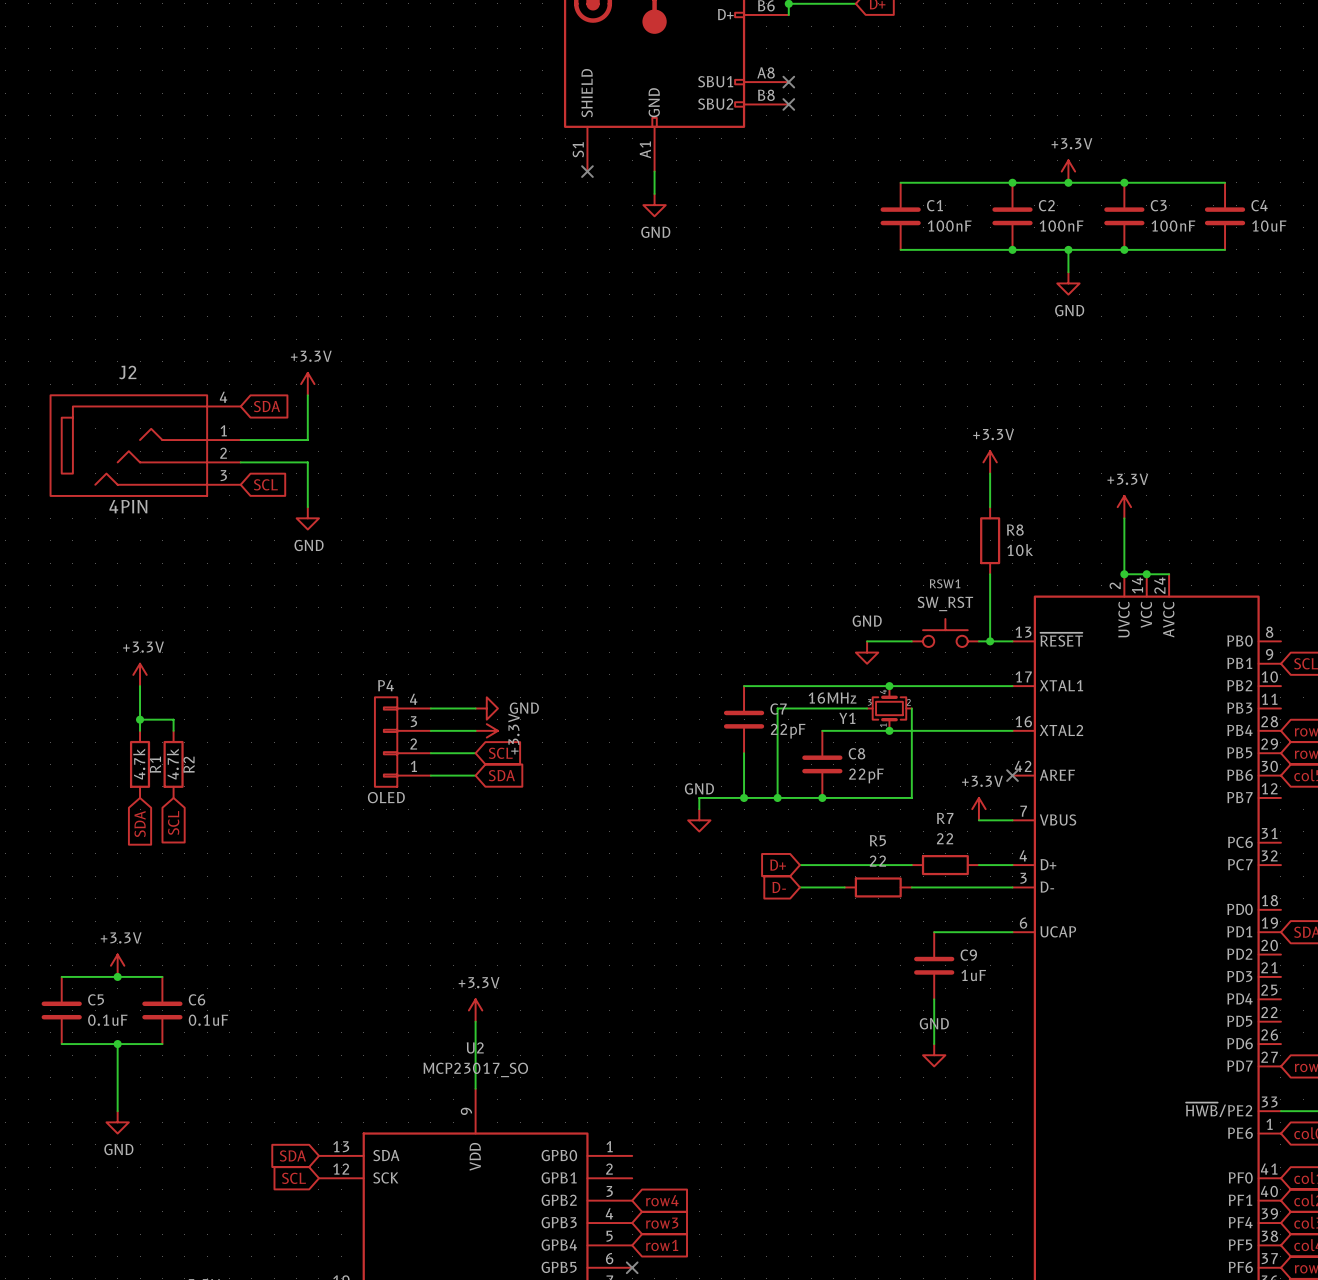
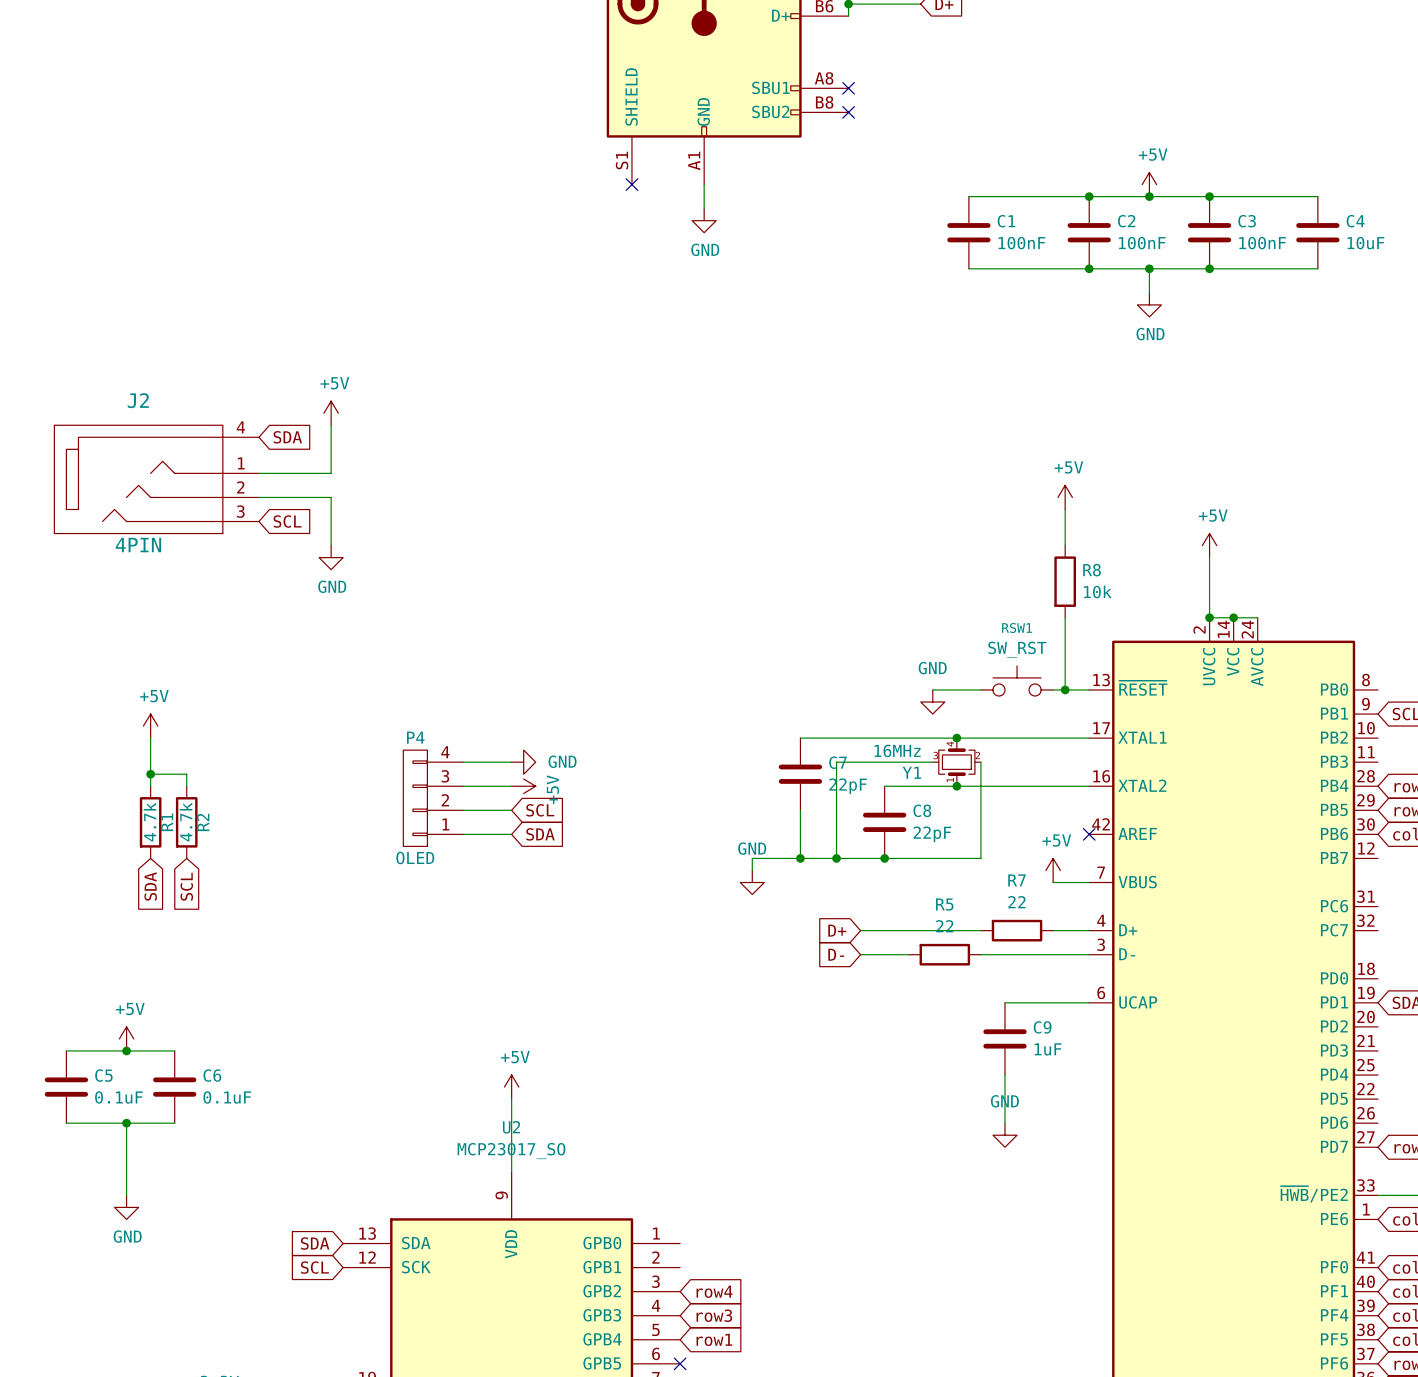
power symbol: +3.3V (1068, 171) -> +5V (1149, 184)
power symbol: +3.3V (307, 384) -> +5V (331, 413)
power symbol: +3.3V (990, 462) -> +5V (1065, 497)
power symbol: +3.3V (1124, 507) -> +5V (1209, 545)
power symbol: +3.3V (140, 674) -> +5V (150, 726)
power symbol: +3.3V (486, 730) -> +5V (523, 786)
power symbol: +3.3V (978, 809) -> +5V (1053, 870)
power symbol: +3.3V (117, 965) -> +5V (126, 1038)
power symbol: +3.3V (475, 1010) -> +5V (511, 1087)

